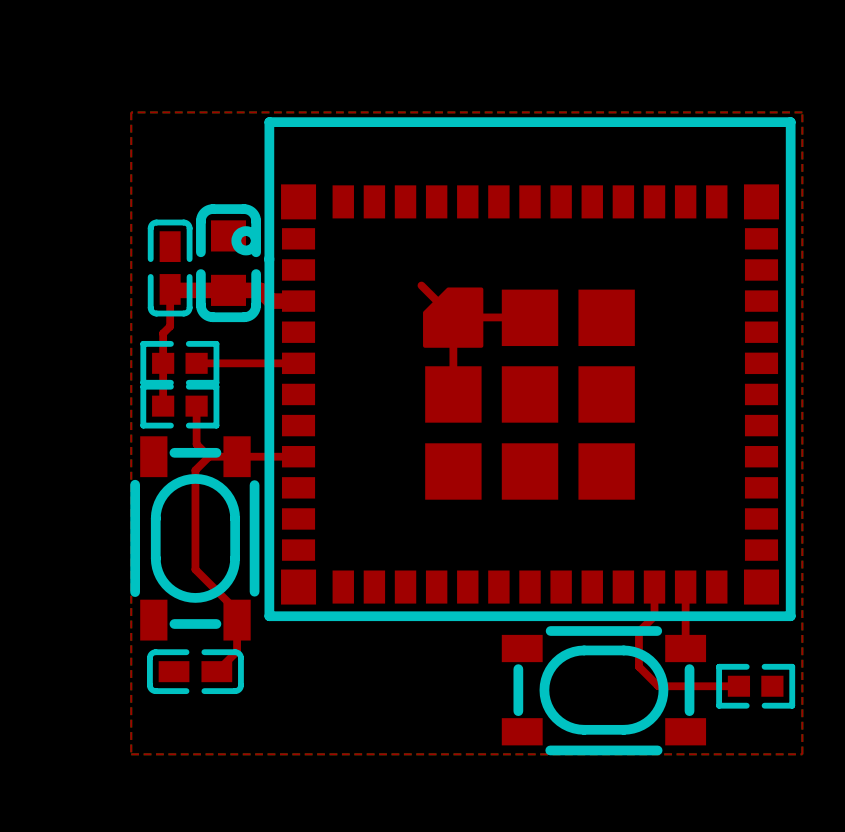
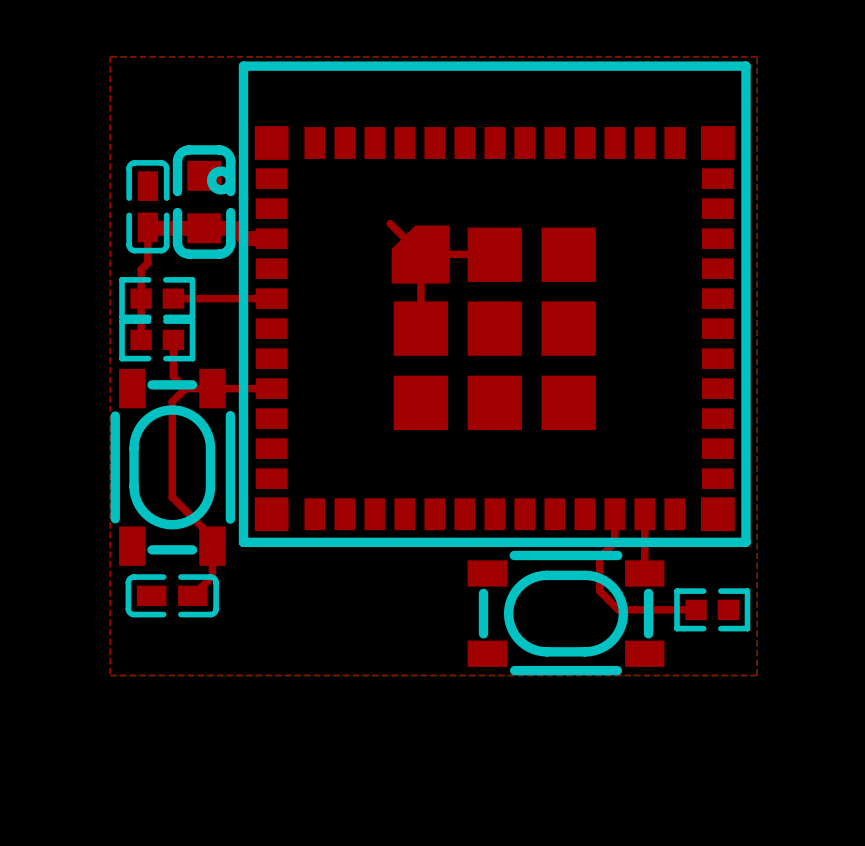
part rotation: 0° (194, 538) -> 180° (172, 467)
part rotation: 0° (603, 690) -> 180° (566, 613)

